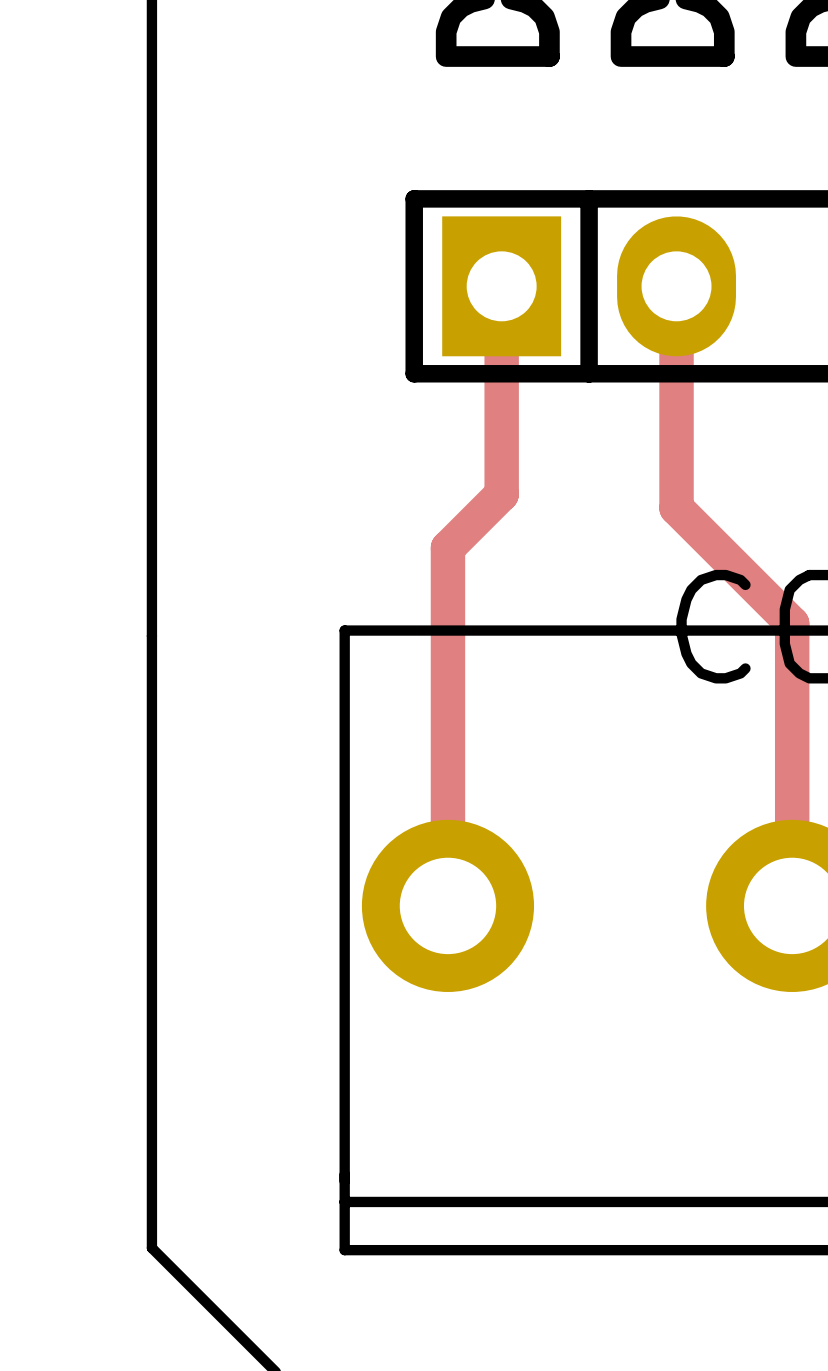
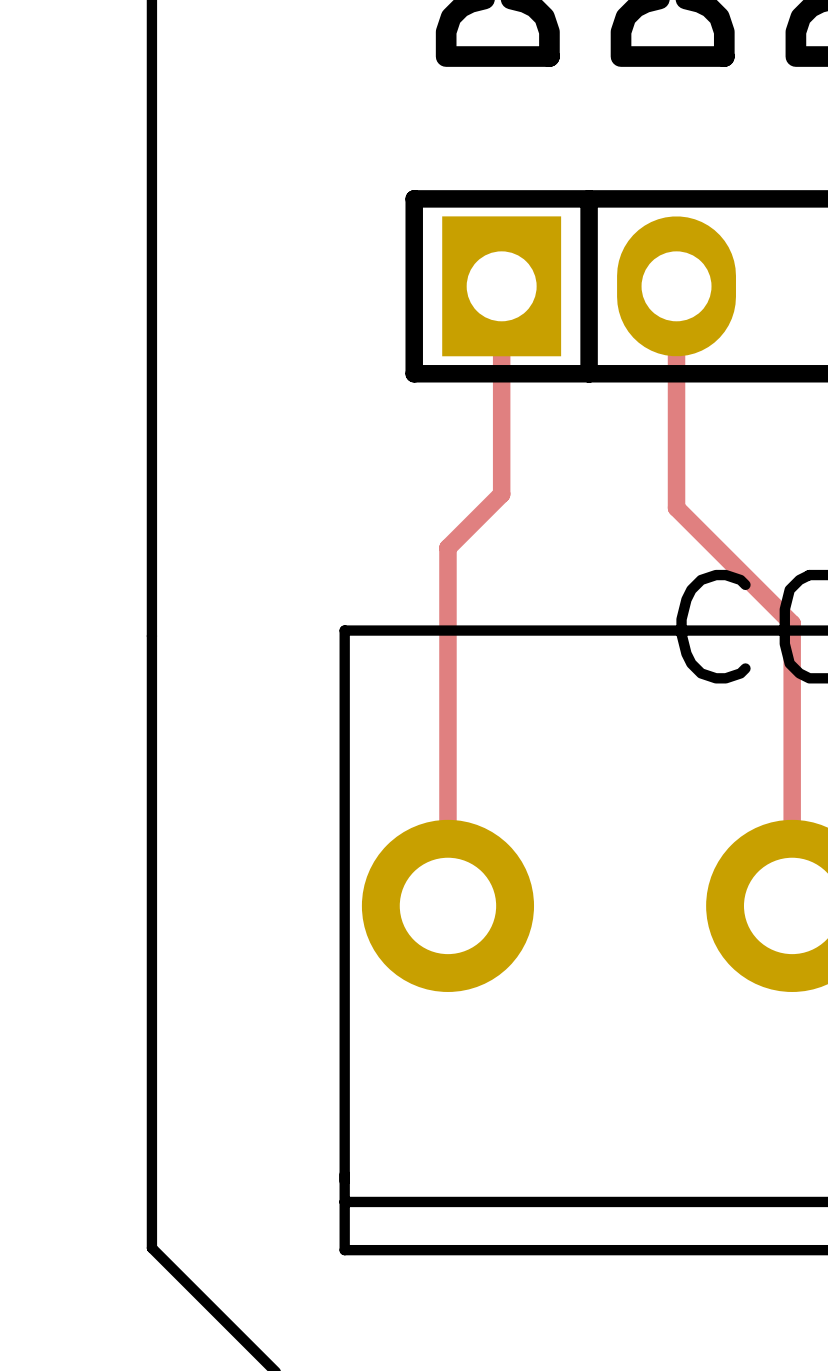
top track width: thick (501, 286) (501, 494) (447, 547) (447, 905) -> thin (501, 286) (501, 494) (447, 547) (447, 905)
top track width: thick (676, 286) (676, 508) (792, 623) (792, 905) -> thin (676, 286) (676, 508) (792, 623) (792, 905)

